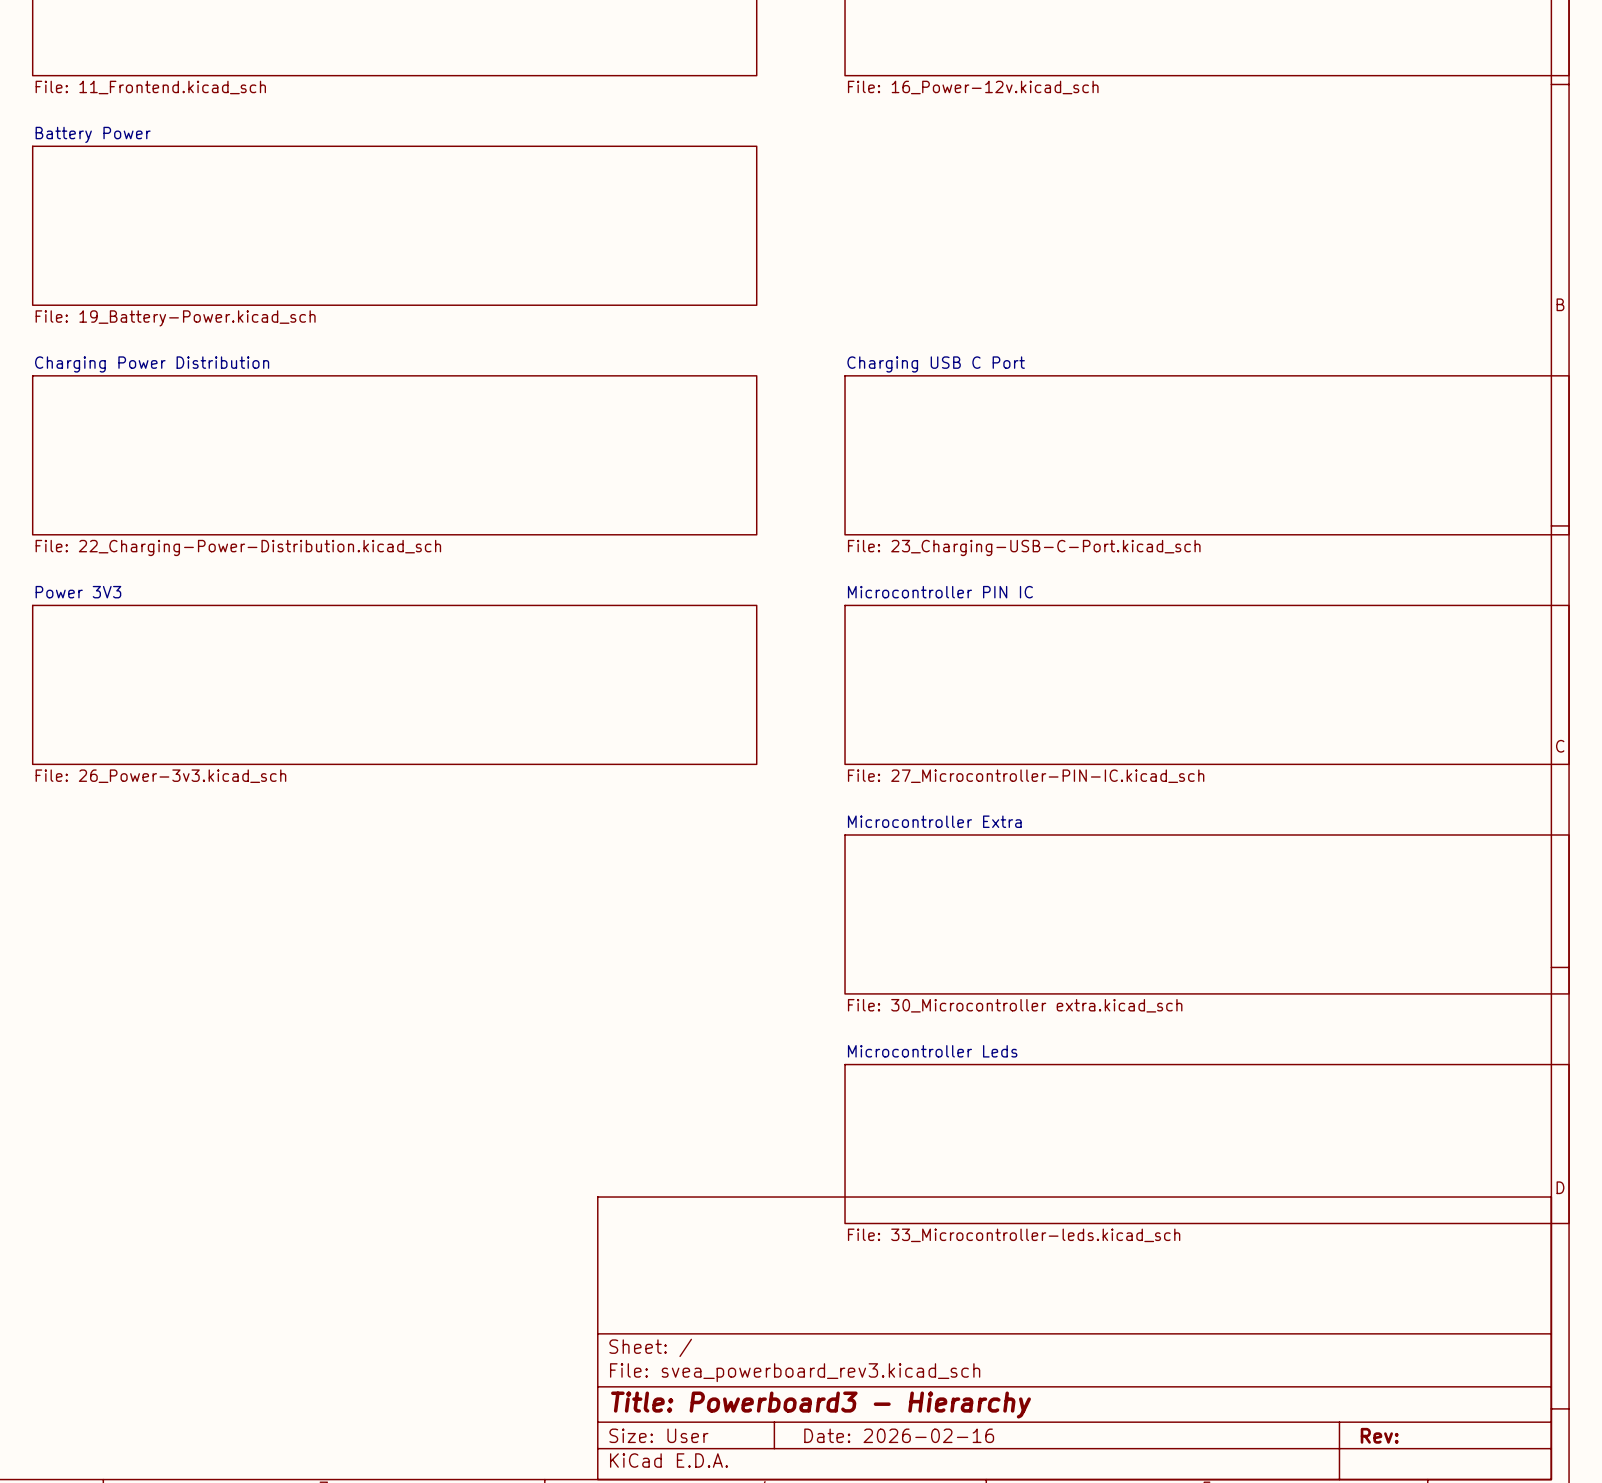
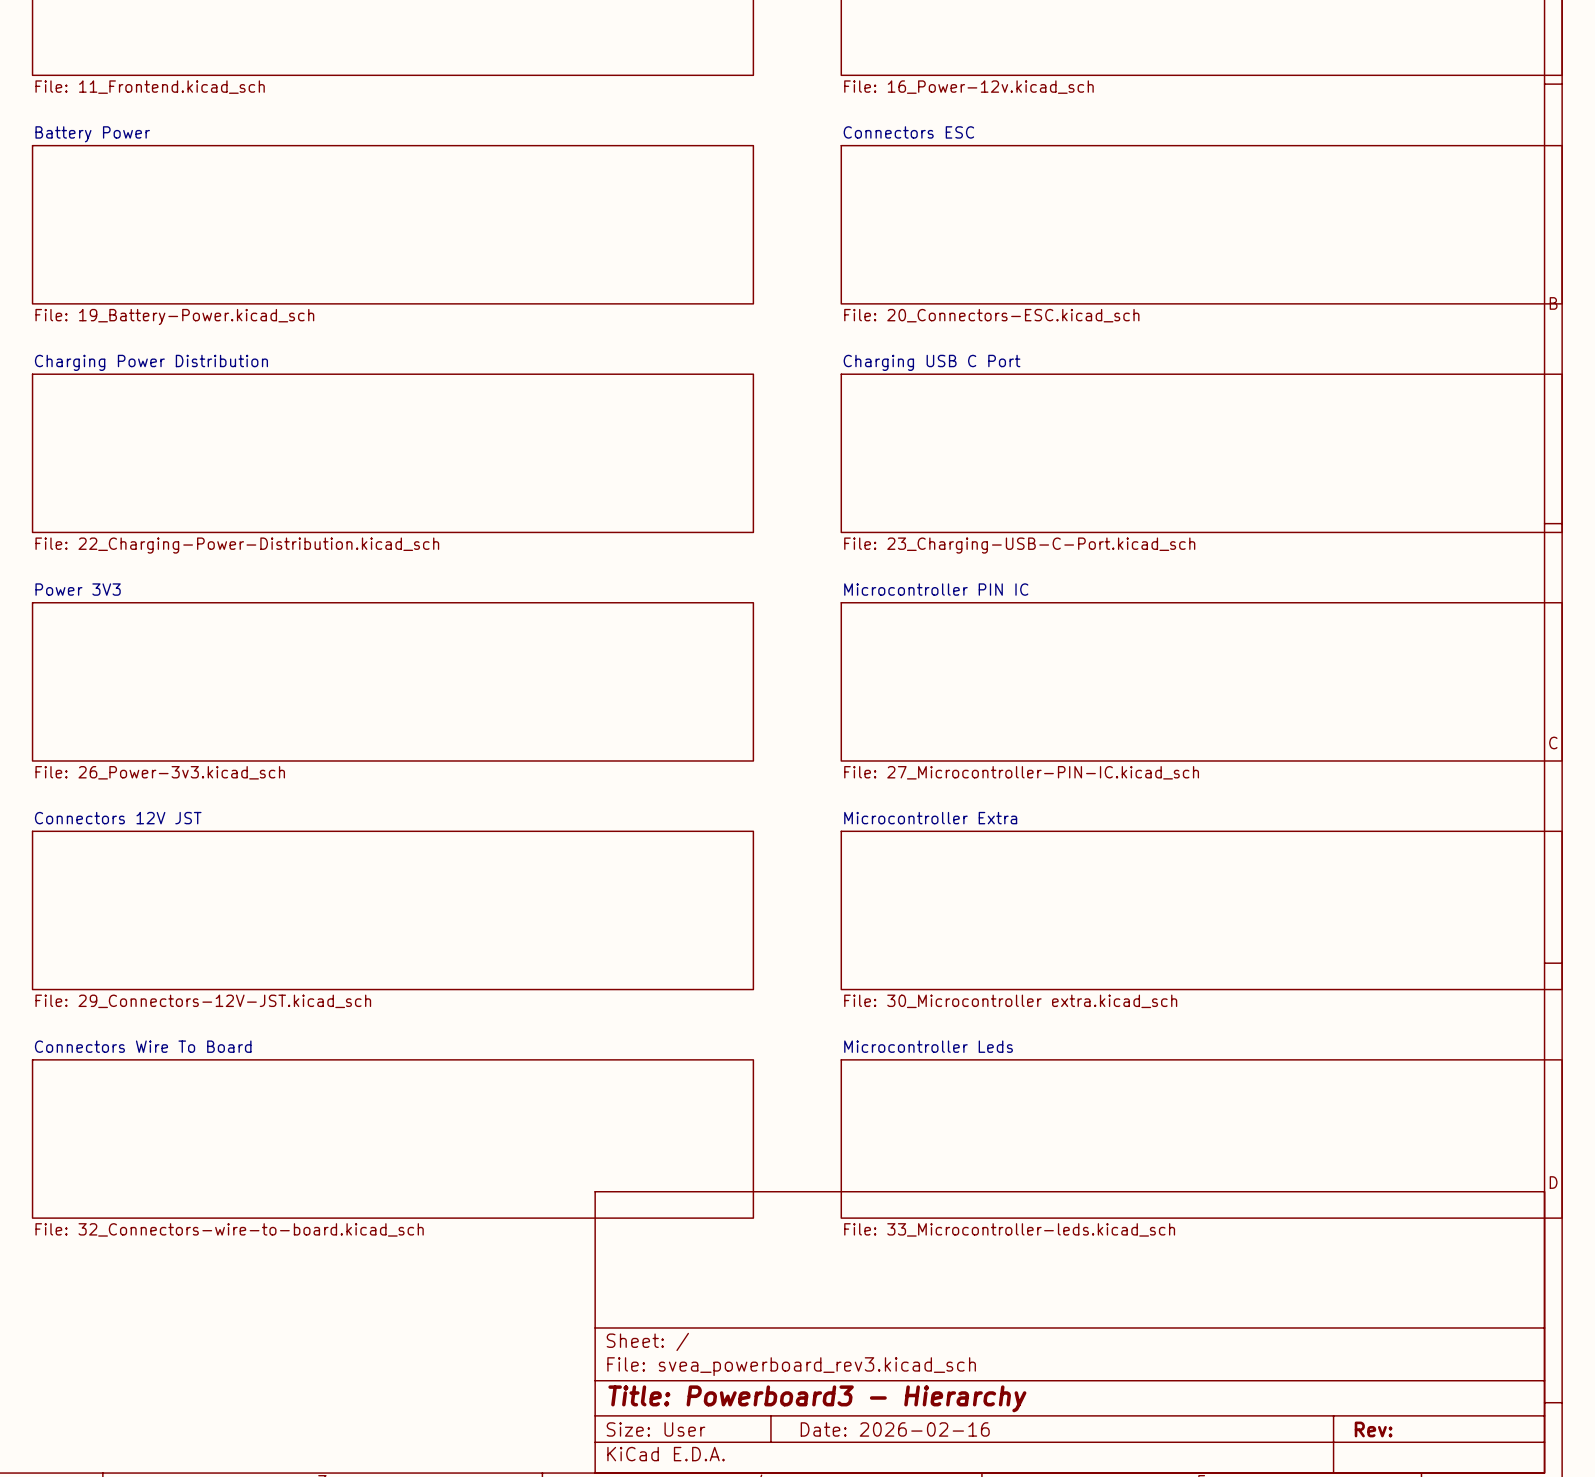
sheet Connectors ESC: none -> File: 20_Connectors-ESC.kicad_sch (1201, 224)
sheet Connectors 12V JST: none -> File: 29_Connectors-12V-JST.kicad_sch (392, 910)
sheet Connectors Wire To Board: none -> File: 32_Connectors-wire-to-board.kicad_sch (392, 1138)

